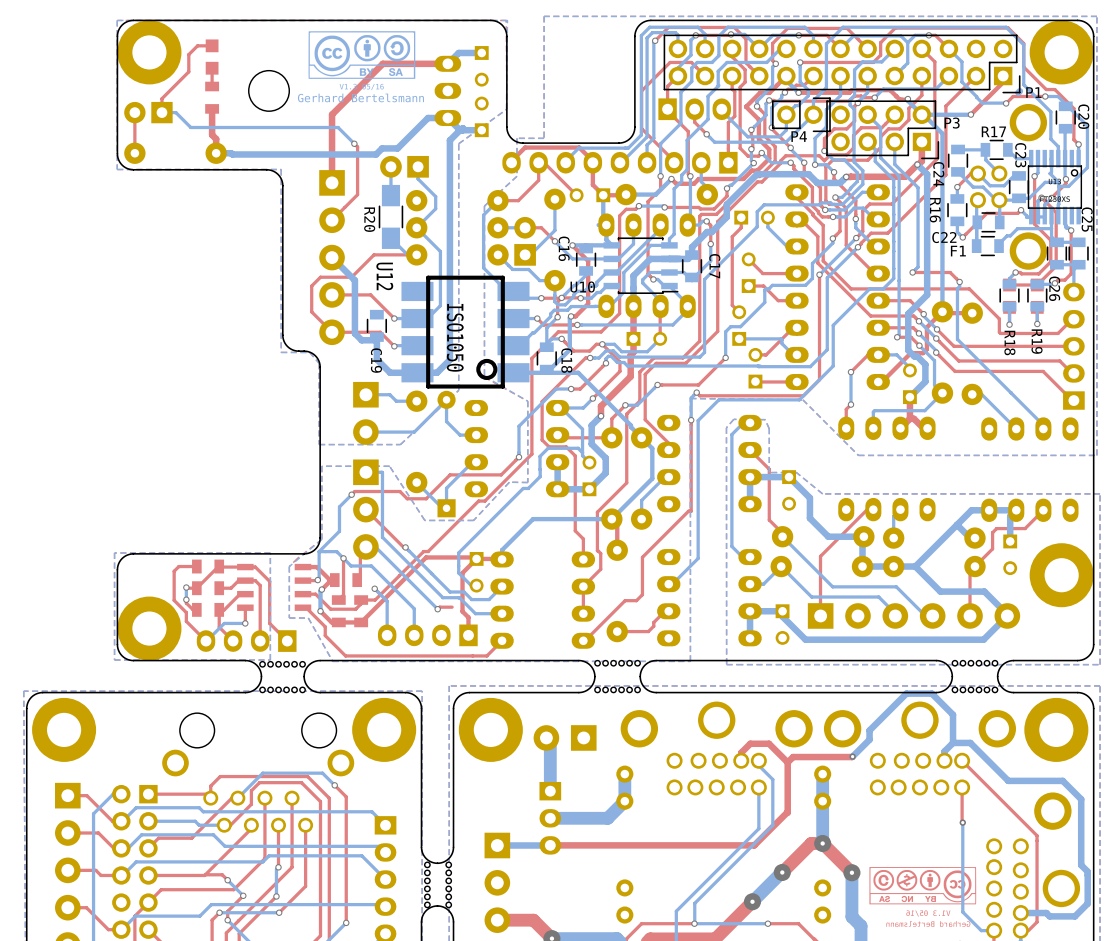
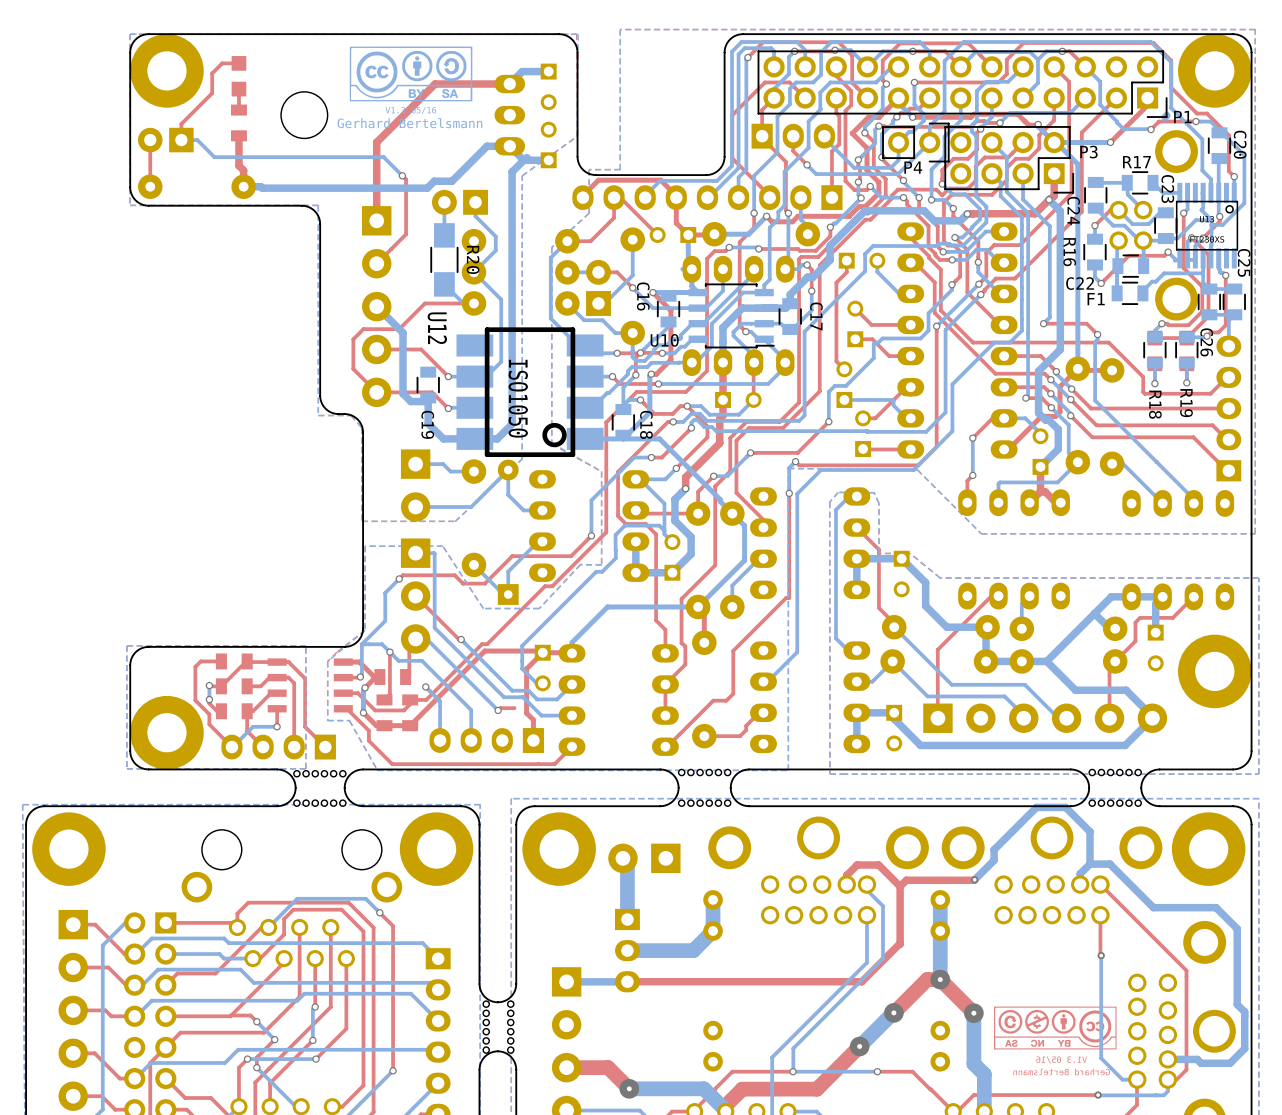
R20 name position: R20 (369, 219) -> R20 (473, 259)

